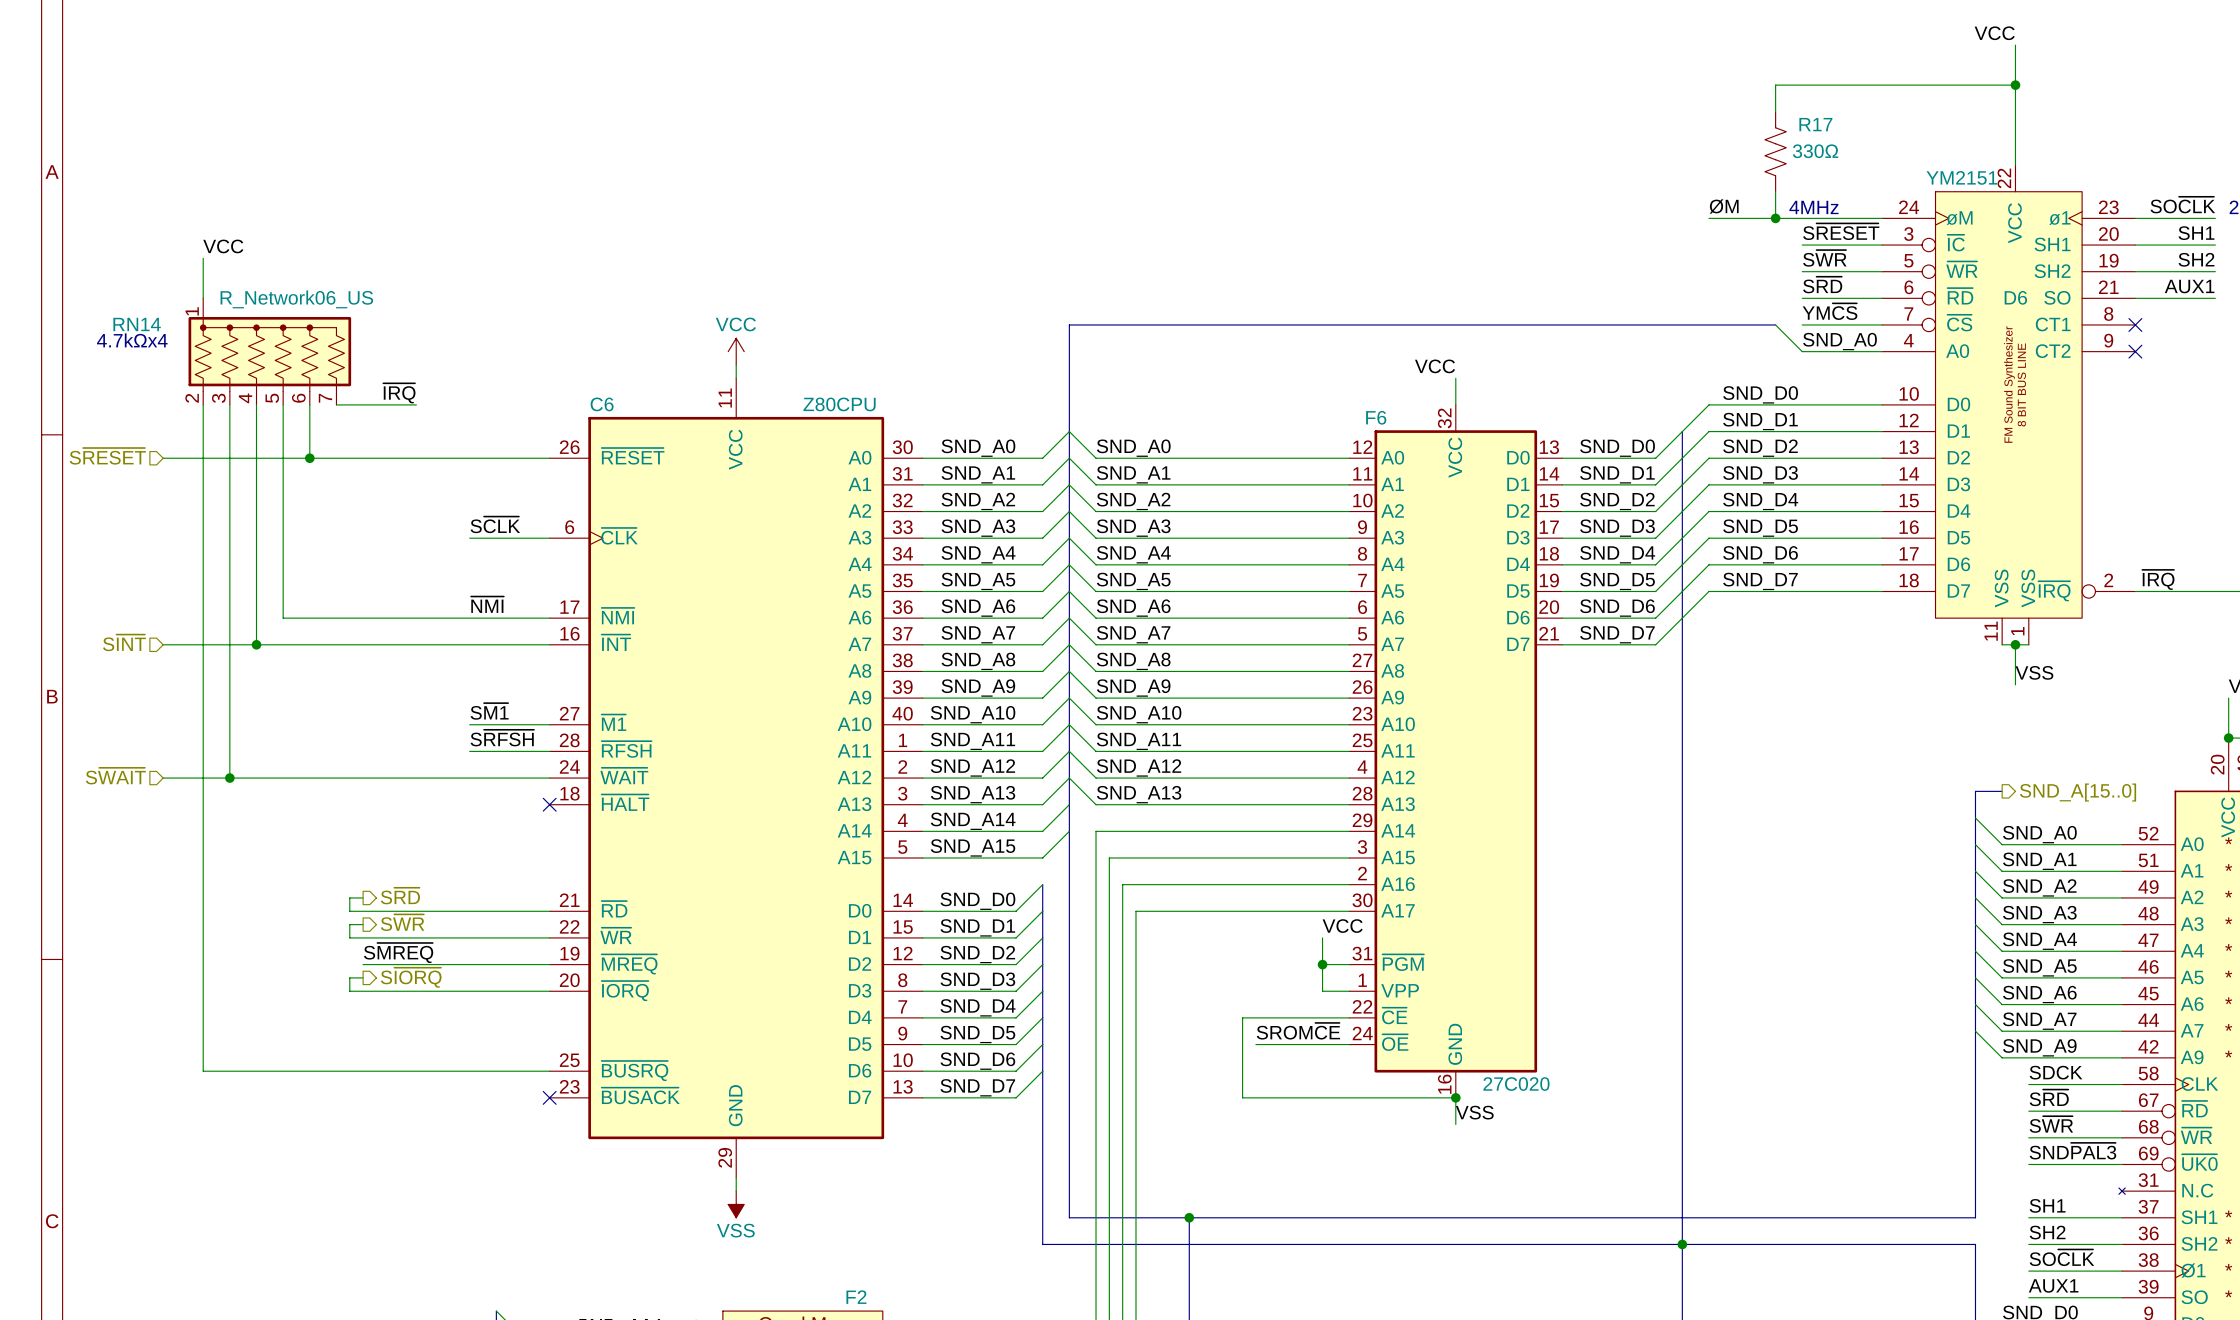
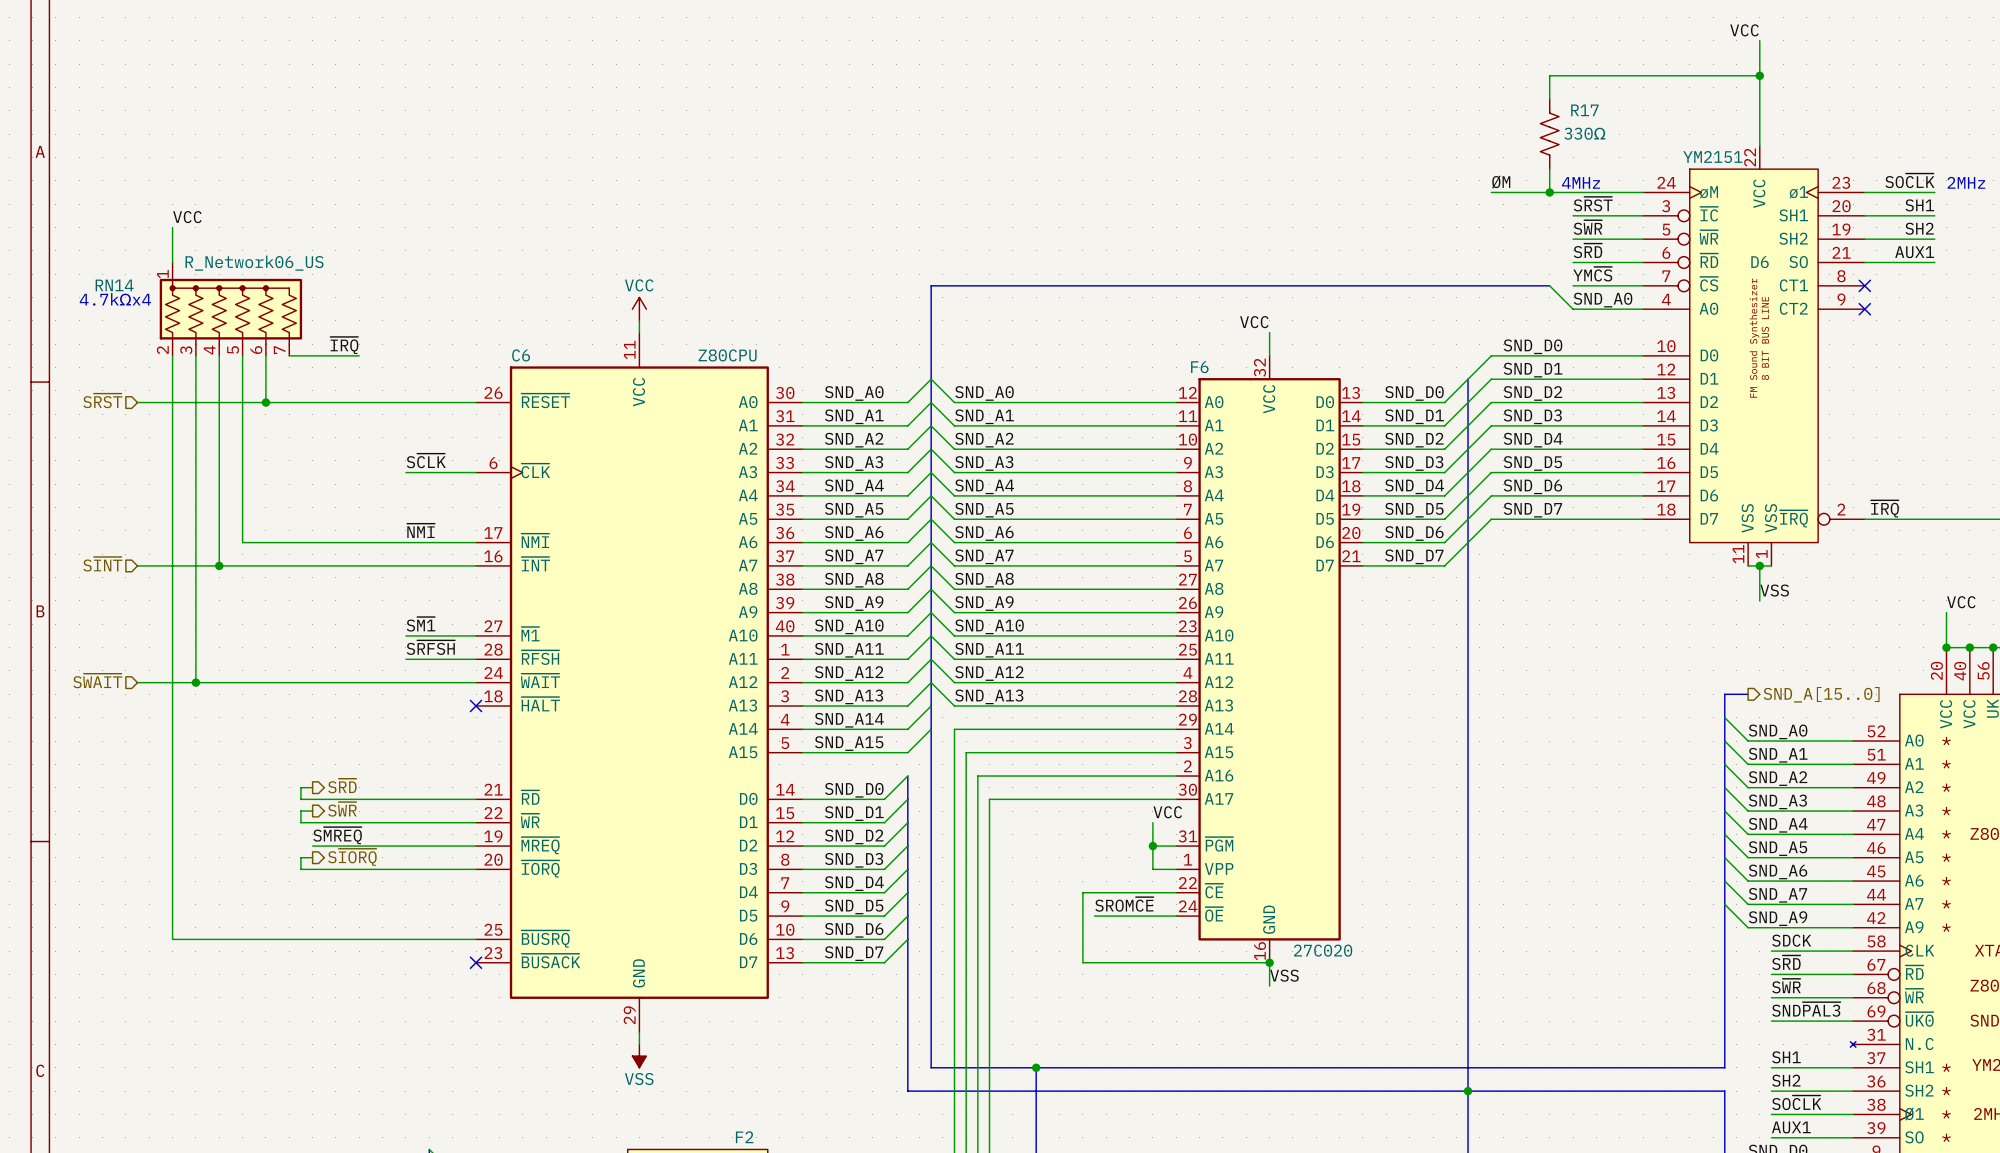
label: S~{RESET} (1841, 231) -> S~{RST} (1593, 204)
hierarchical label: S~{RESET} (107, 456) -> S~{RST} (102, 400)

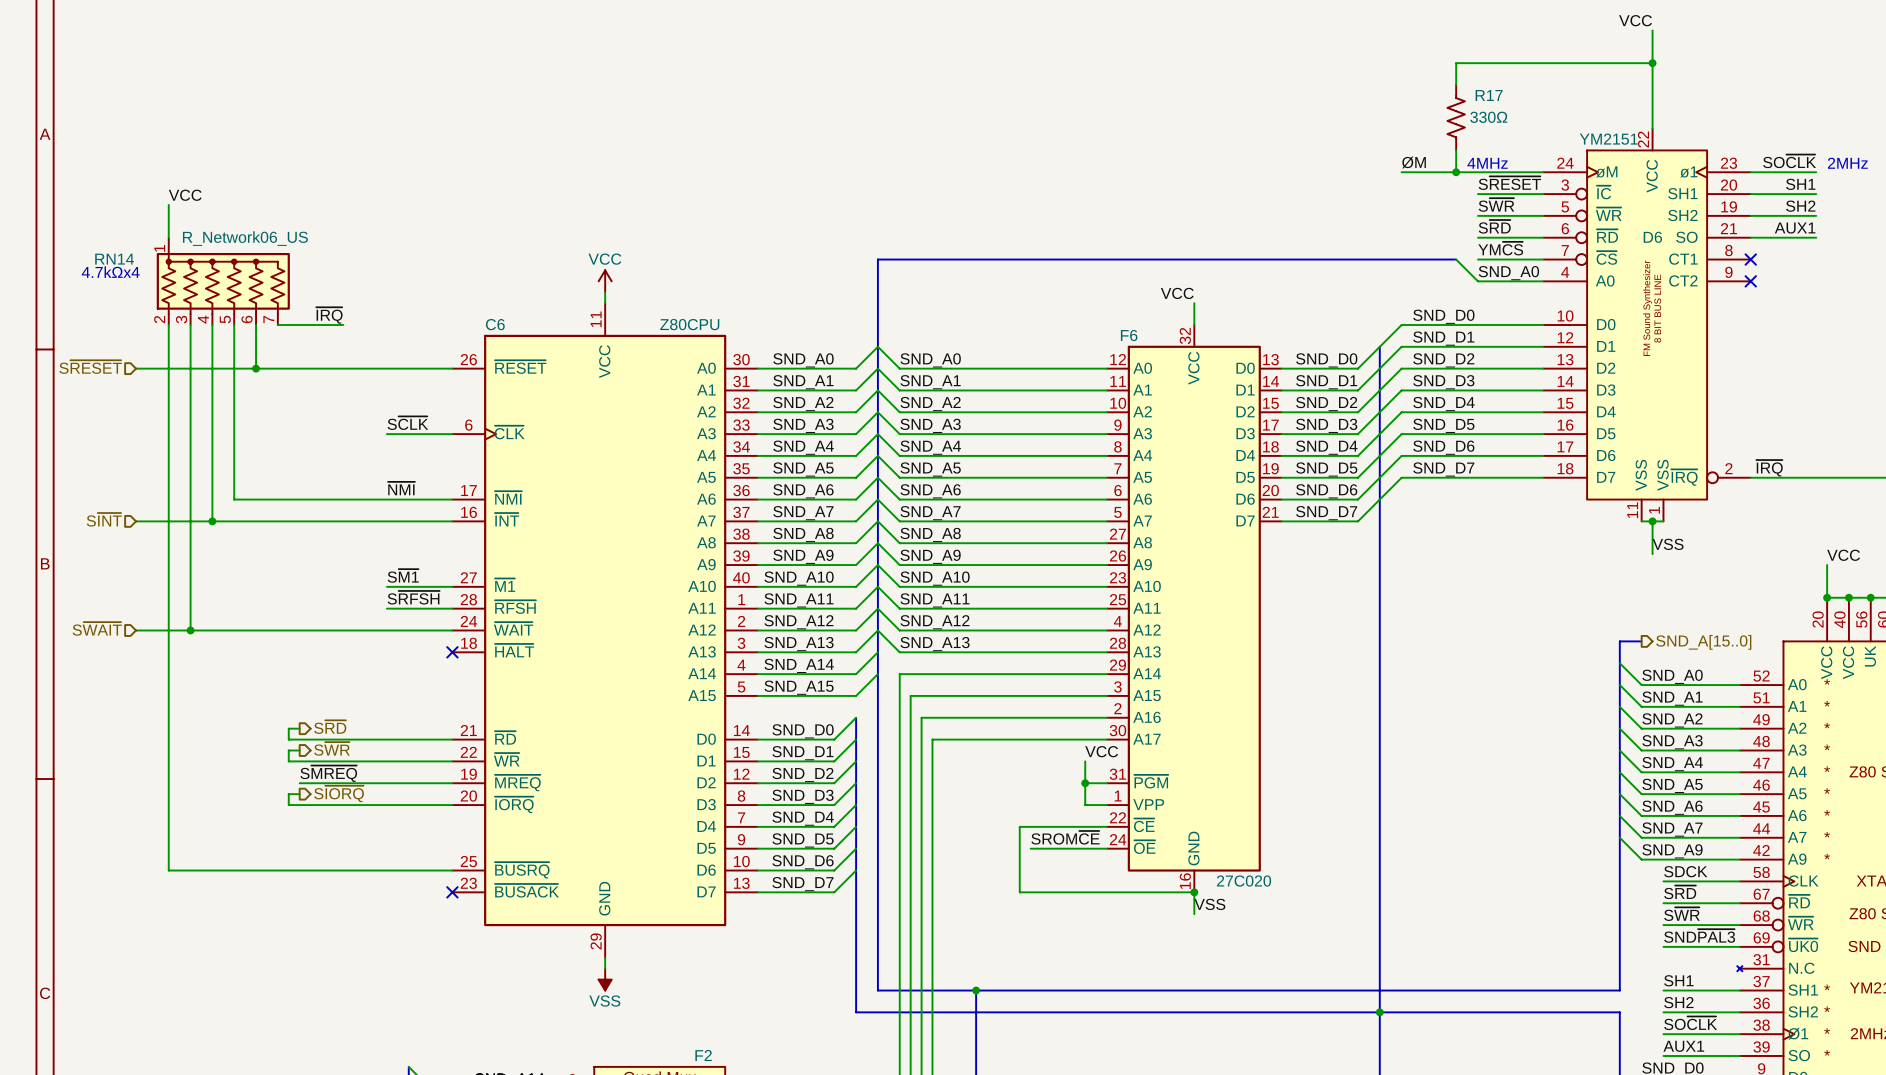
label: S~{RST} (1593, 204) -> S~{RESET} (1509, 183)
hierarchical label: S~{RST} (102, 400) -> S~{RESET} (90, 367)

